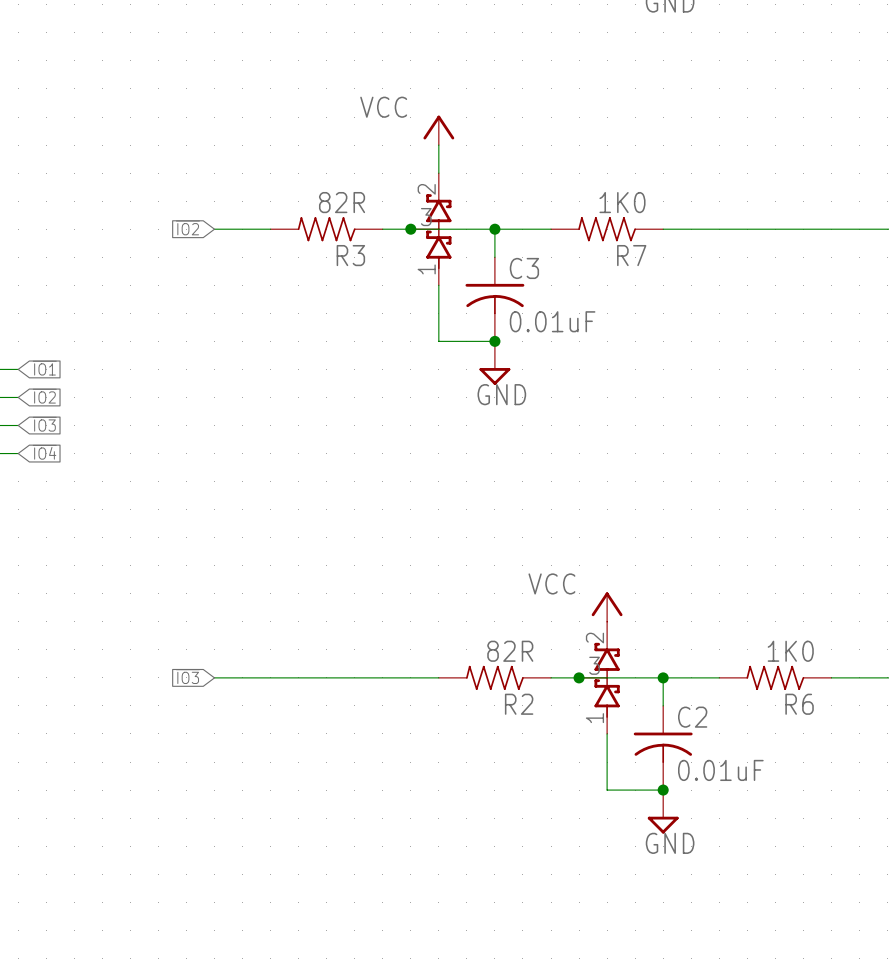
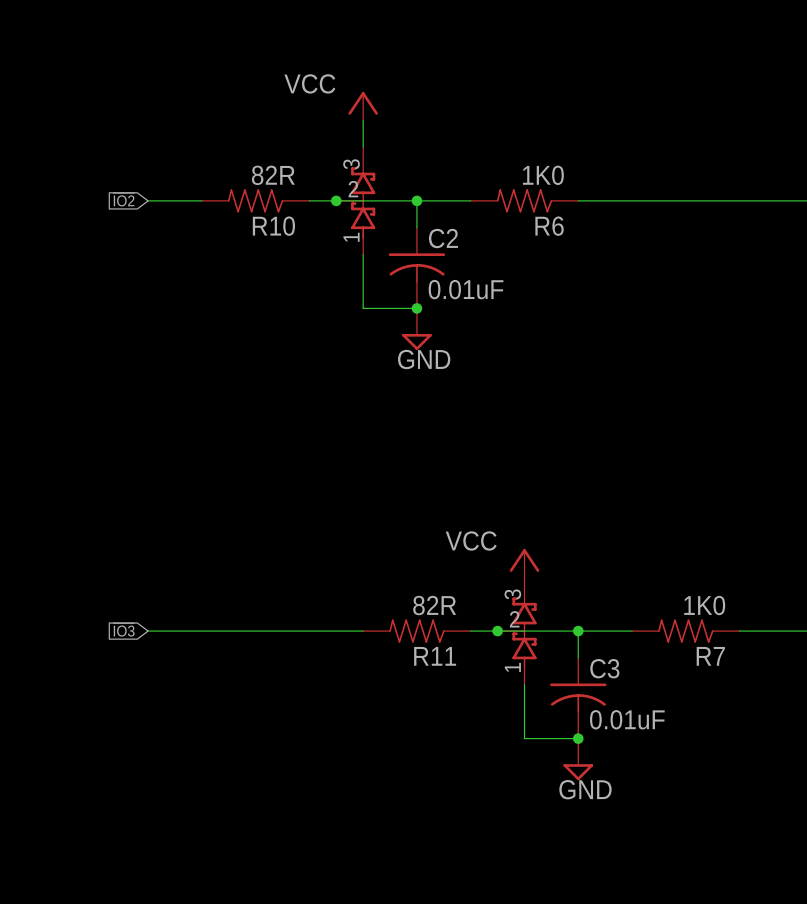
part pin number: 2 (426, 189) -> 3 (351, 164)
part pin number: 3 (426, 217) -> 2 (353, 189)
R3 name: R3 (350, 255) -> R10 (273, 226)
R7 name: R7 (631, 255) -> R6 (549, 226)
C3 name: C3 (524, 268) -> C2 (443, 238)
part pin number: 2 (594, 638) -> 3 (512, 594)
part pin number: 3 (594, 665) -> 2 (514, 619)
R2 name: R2 (519, 704) -> R11 (435, 656)
R6 name: R6 (799, 704) -> R7 (710, 656)
C2 name: C2 (692, 717) -> C3 (604, 668)

